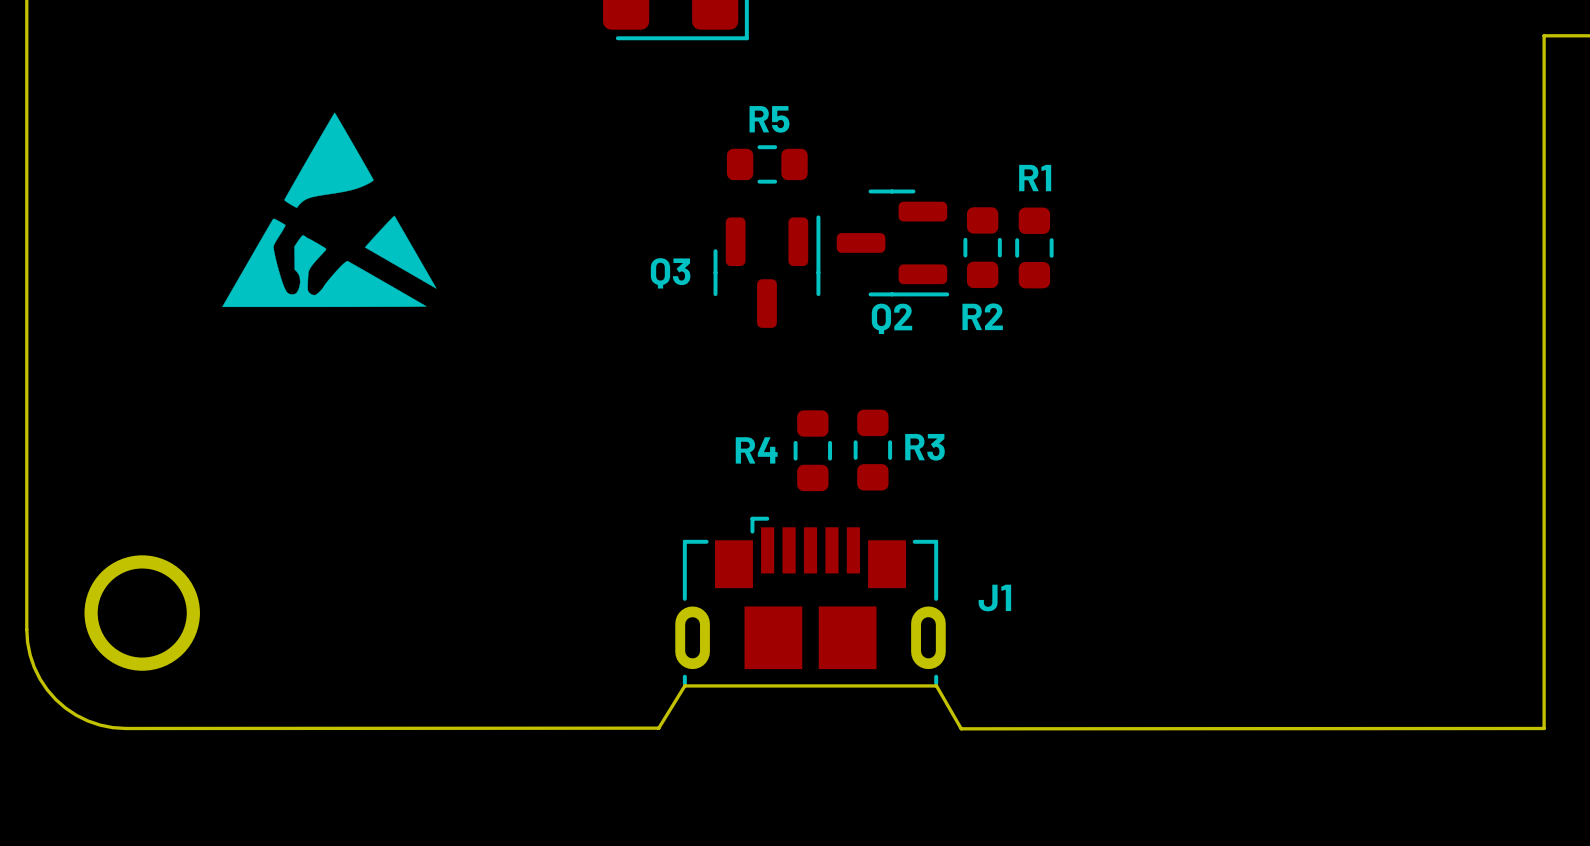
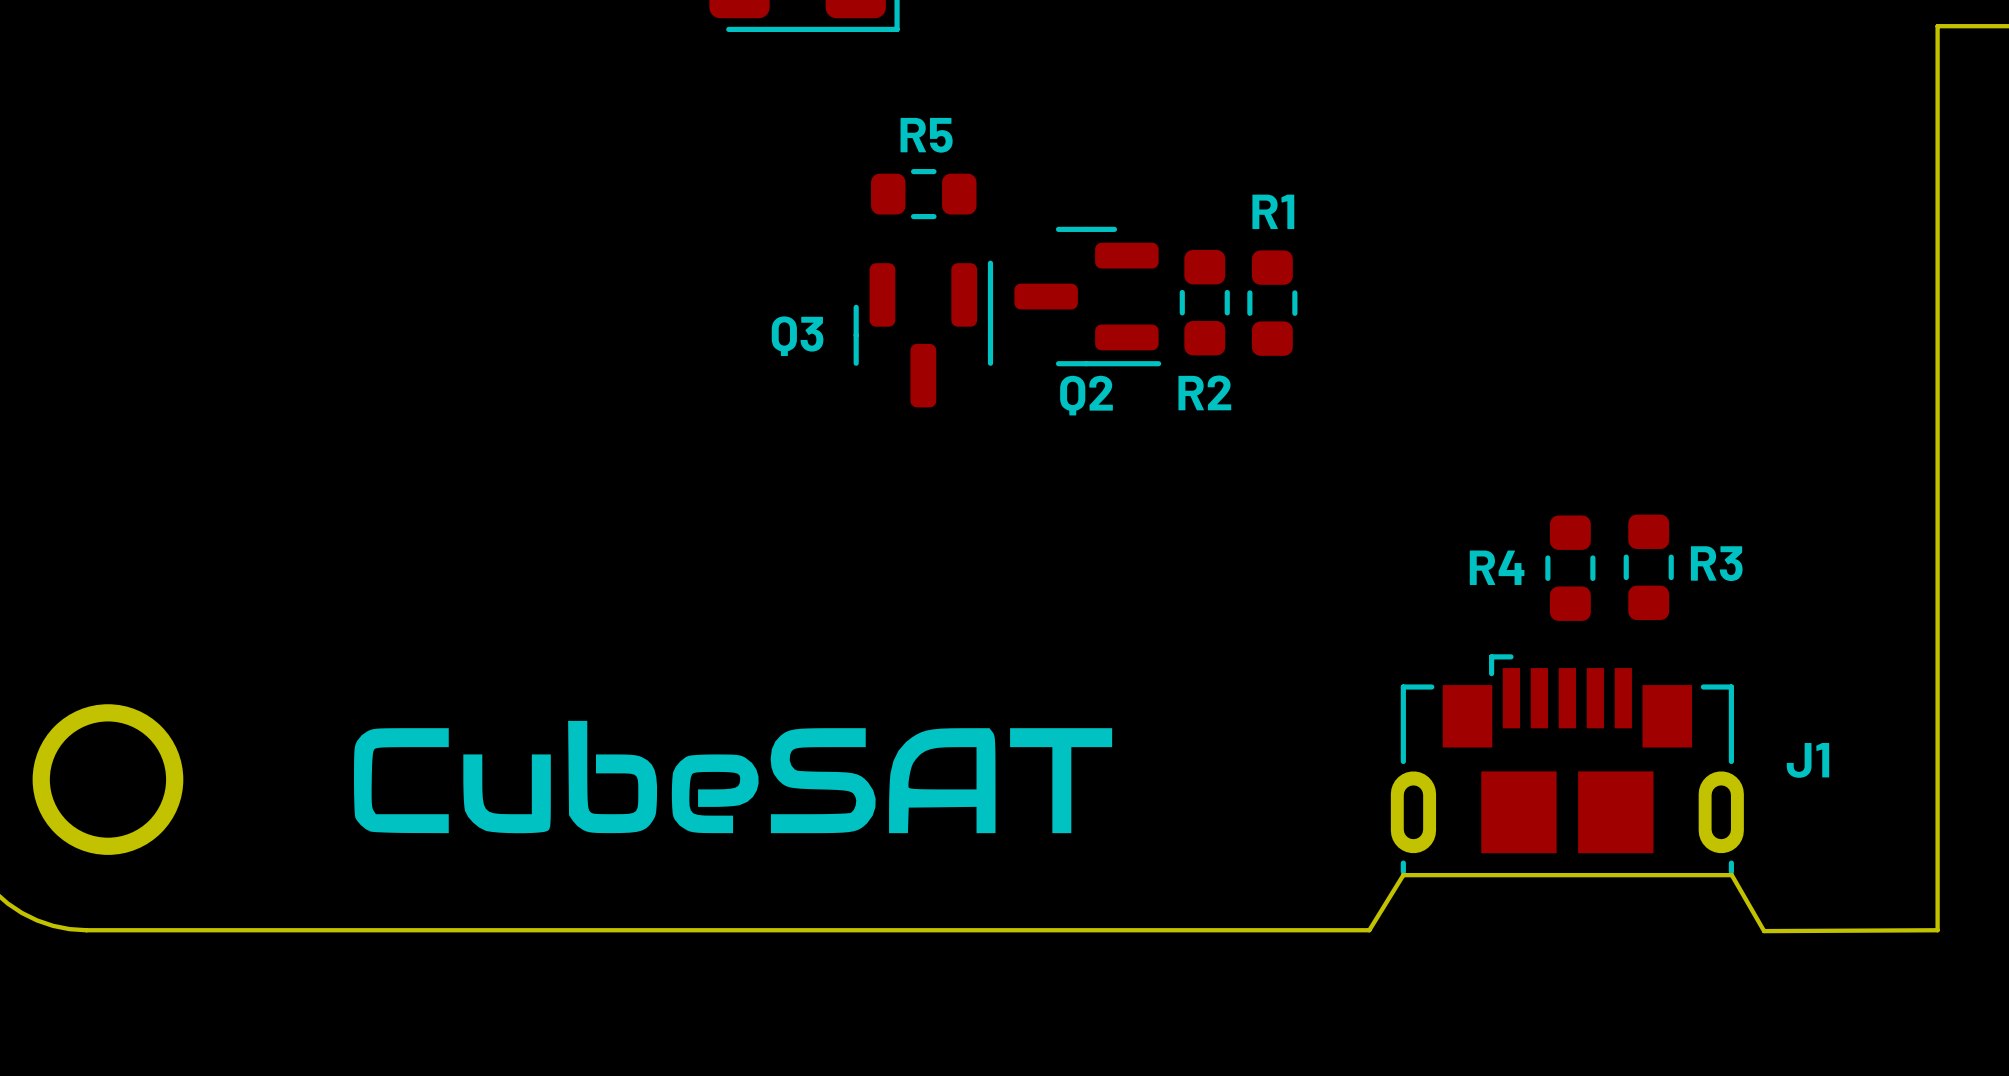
drawing: [222, 112, 437, 308] -> none
R4 position: (812, 450) -> (1570, 568)
R3 position: (872, 450) -> (1648, 567)
drawing: none -> [354, 720, 1113, 834]
J1 position: (810, 601) -> (1567, 764)
board edge: (125, 728) (658, 728) (684, 685) (936, 685) (961, 728) (1544, 728) -> (86, 930) (1369, 930) (1403, 875) (1731, 875) (1764, 931) (1937, 930)

